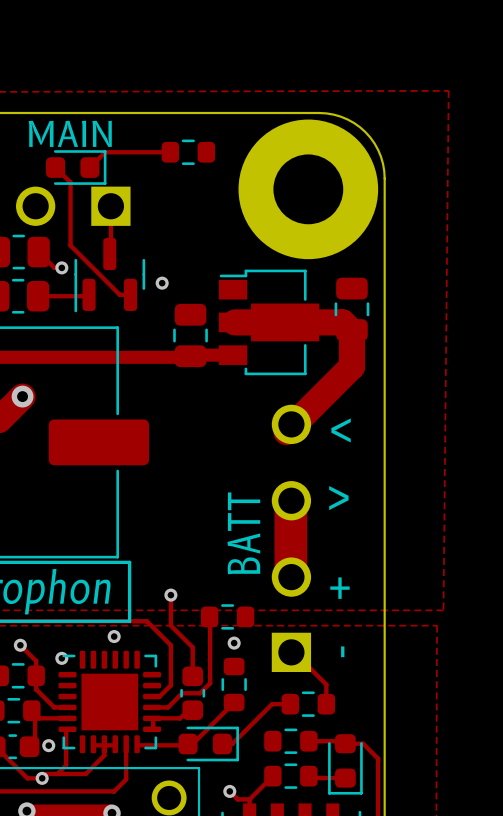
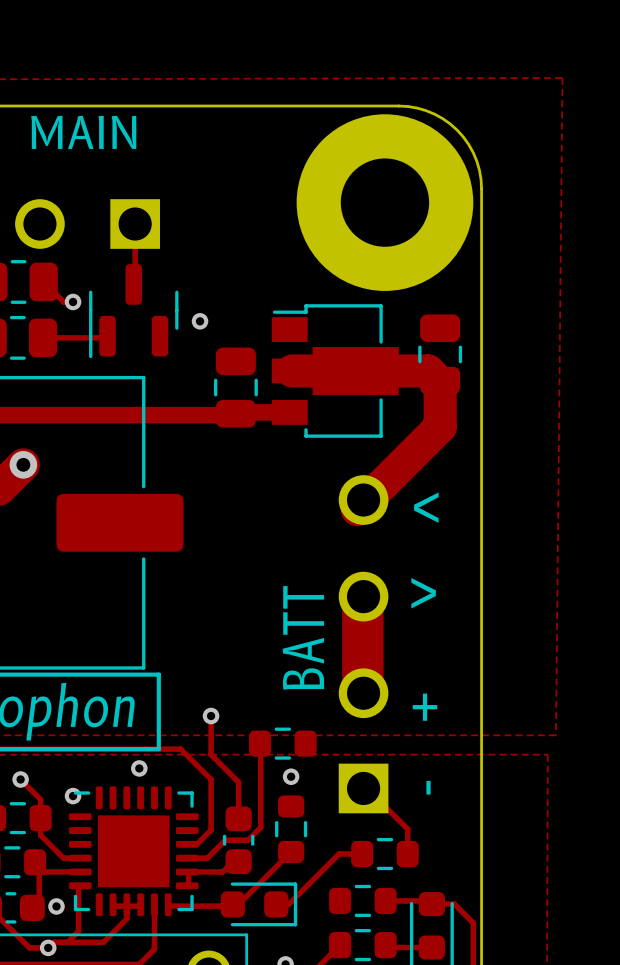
track: (170, 152) (105, 152) (89, 167) -> none
part: (188, 152) -> none
track: (55, 167) (70, 182) (70, 245) (119, 294) (130, 294) -> none
part: (76, 167) -> none

